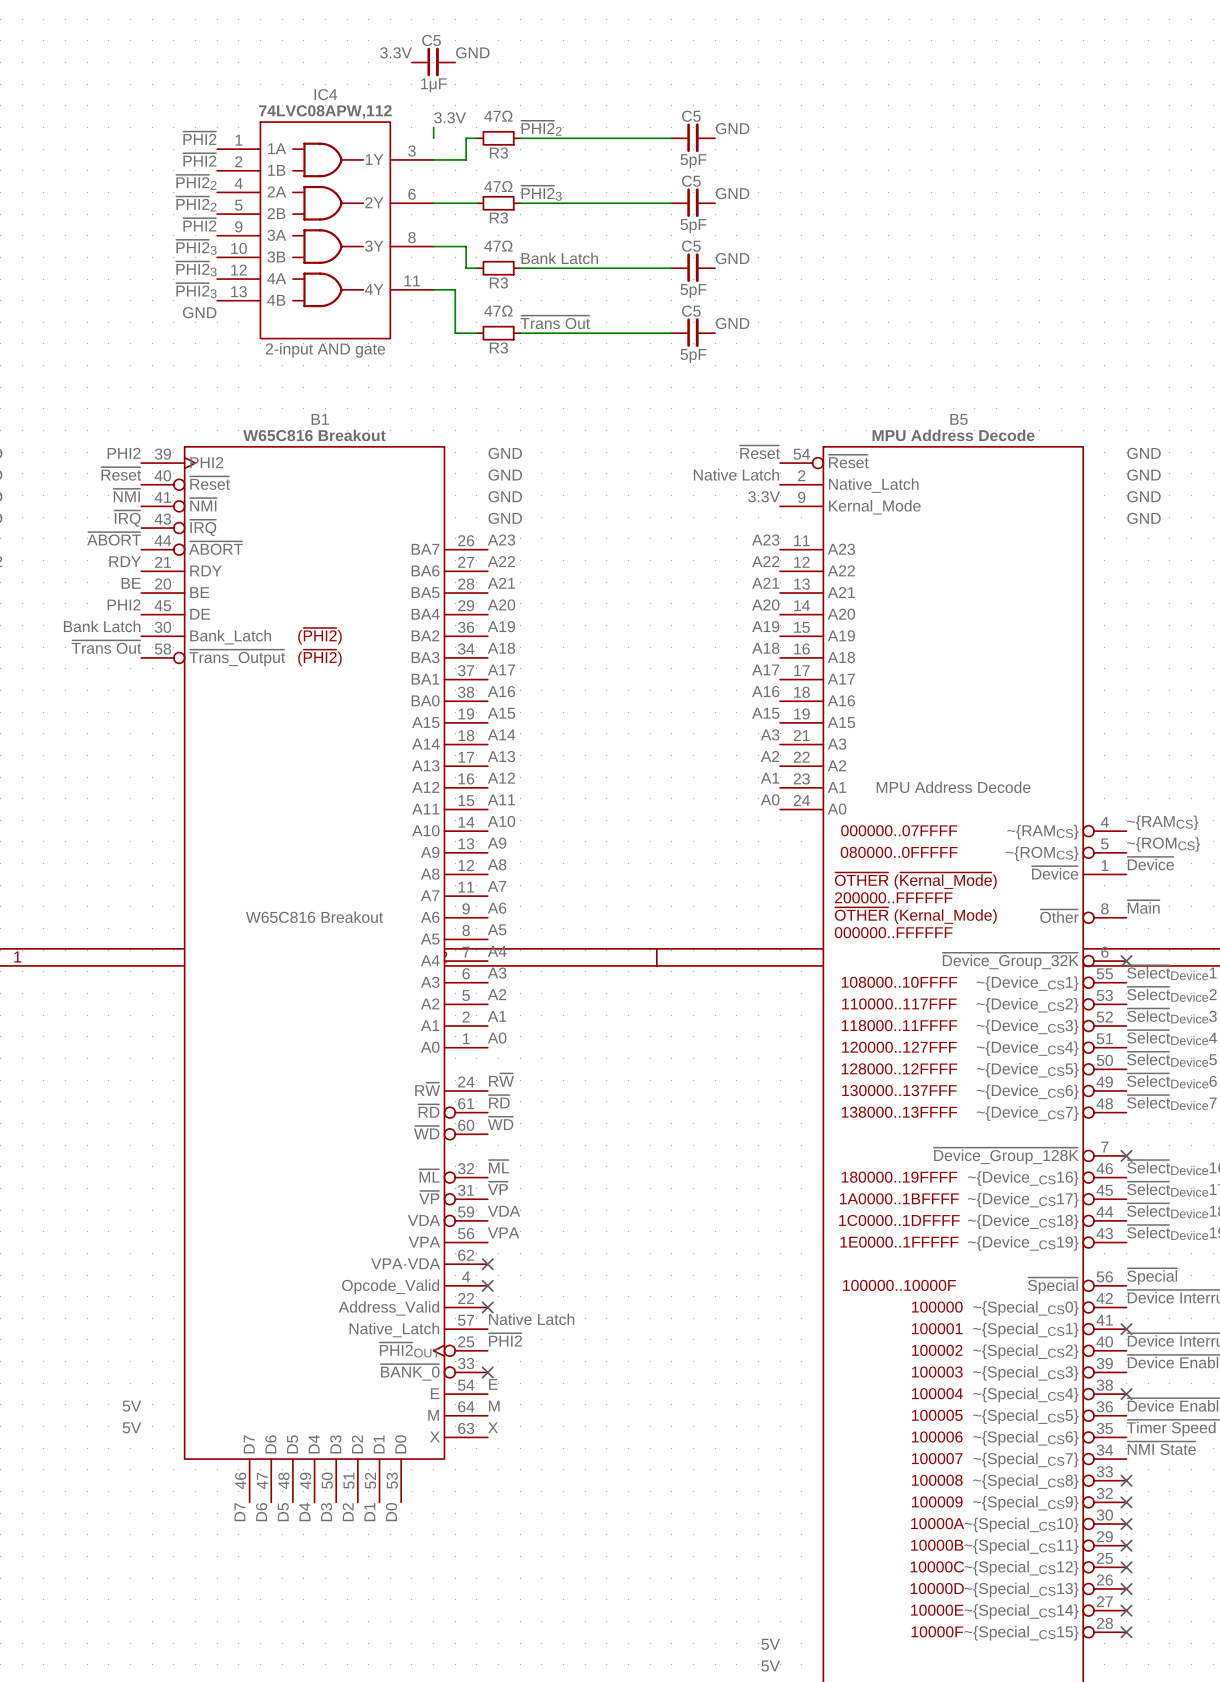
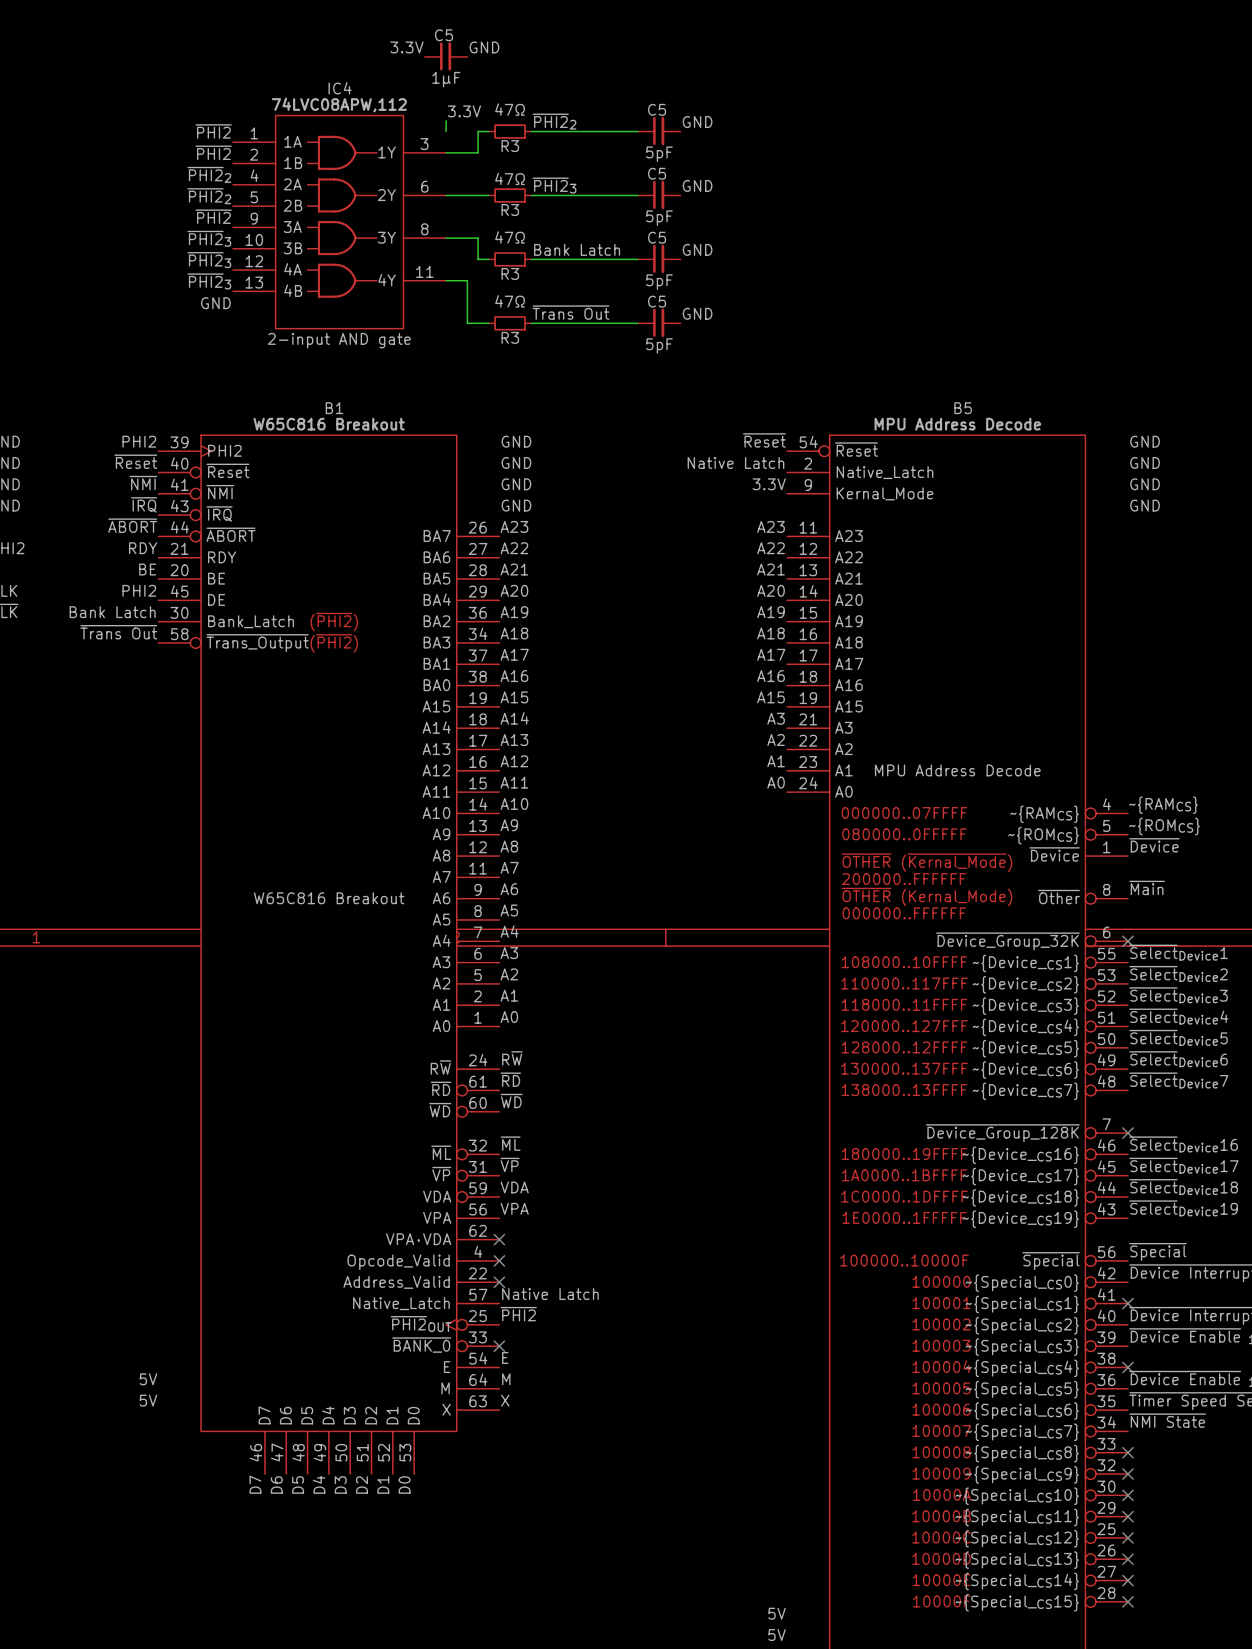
label: none -> GND (697, 122)
label: GND (732, 128) -> none
C5: none -> 5pF (659, 131)
C5: 5pF (693, 137) -> none
label: none -> GND (697, 185)
label: GND (732, 193) -> none
C5: none -> 5pF (659, 194)
C5: 5pF (693, 202) -> none
label: none -> GND (697, 249)
label: GND (732, 258) -> none
C5: none -> 5pF (659, 258)
C5: 5pF (693, 267) -> none
label: none -> GND (697, 313)
label: GND (732, 323) -> none
C5: none -> 5pF (659, 322)
C5: 5pF (693, 332) -> none

